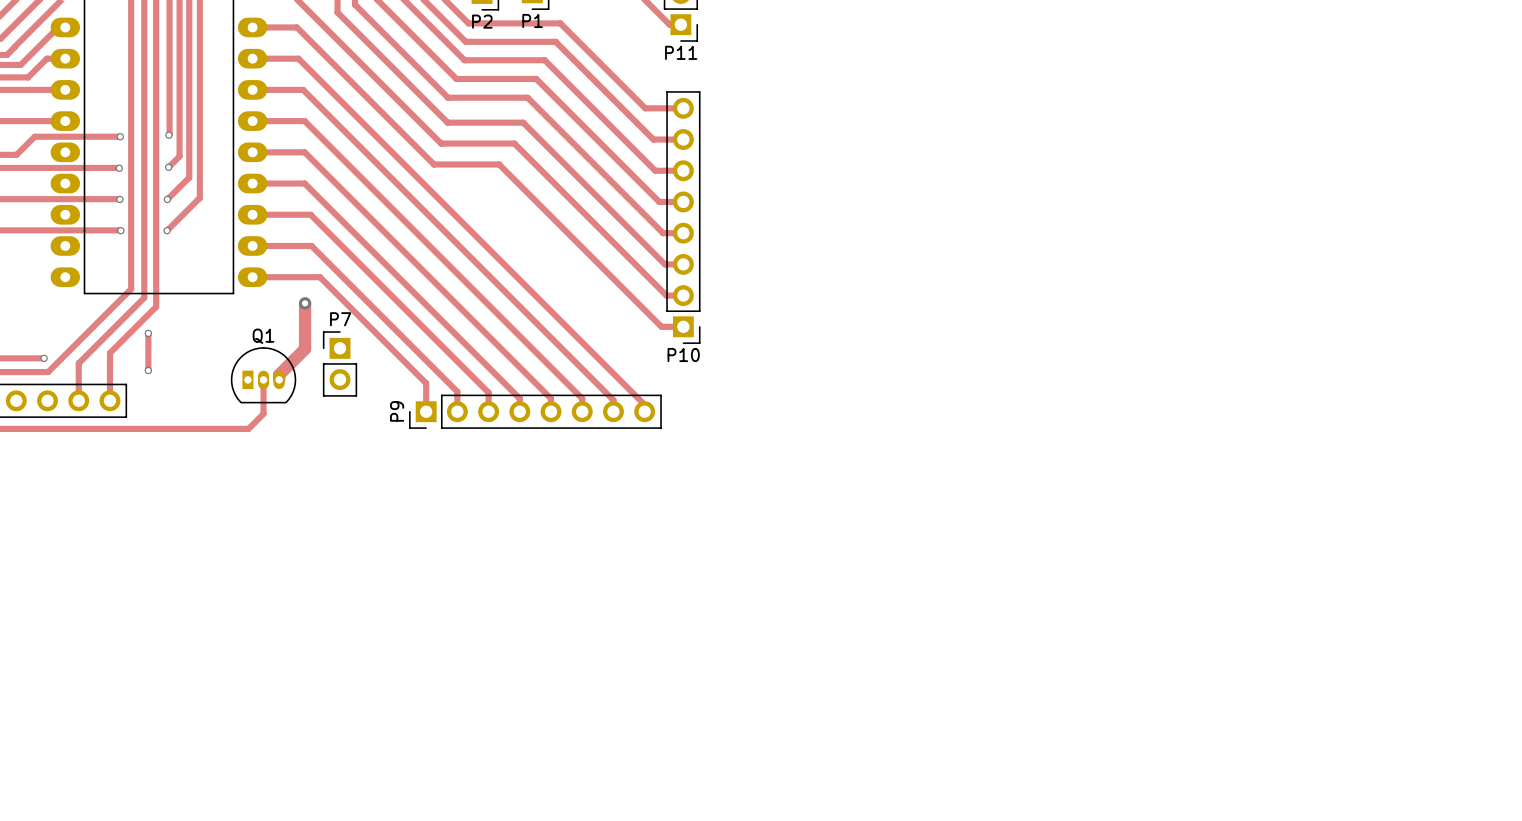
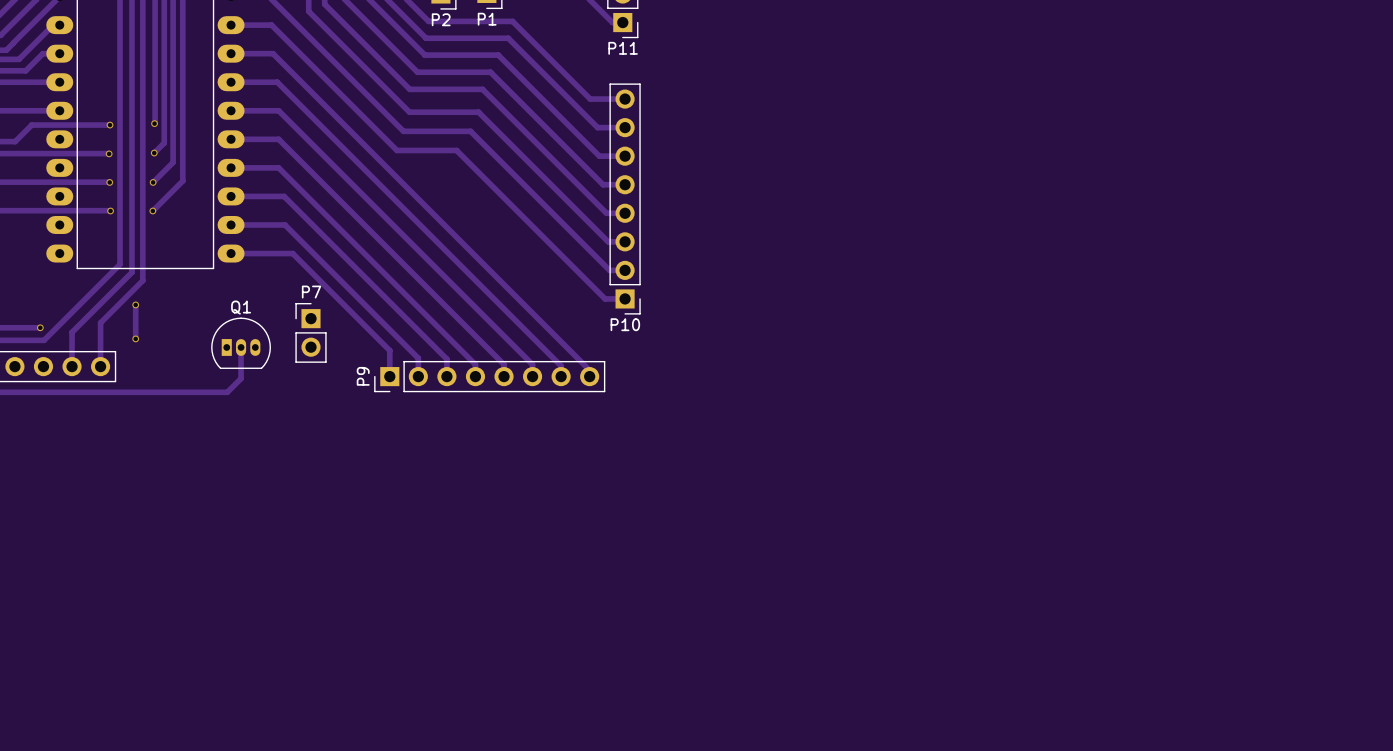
track: (305, 303) (305, 348) (279, 374) (279, 379) -> none
via: (305, 303) -> none

